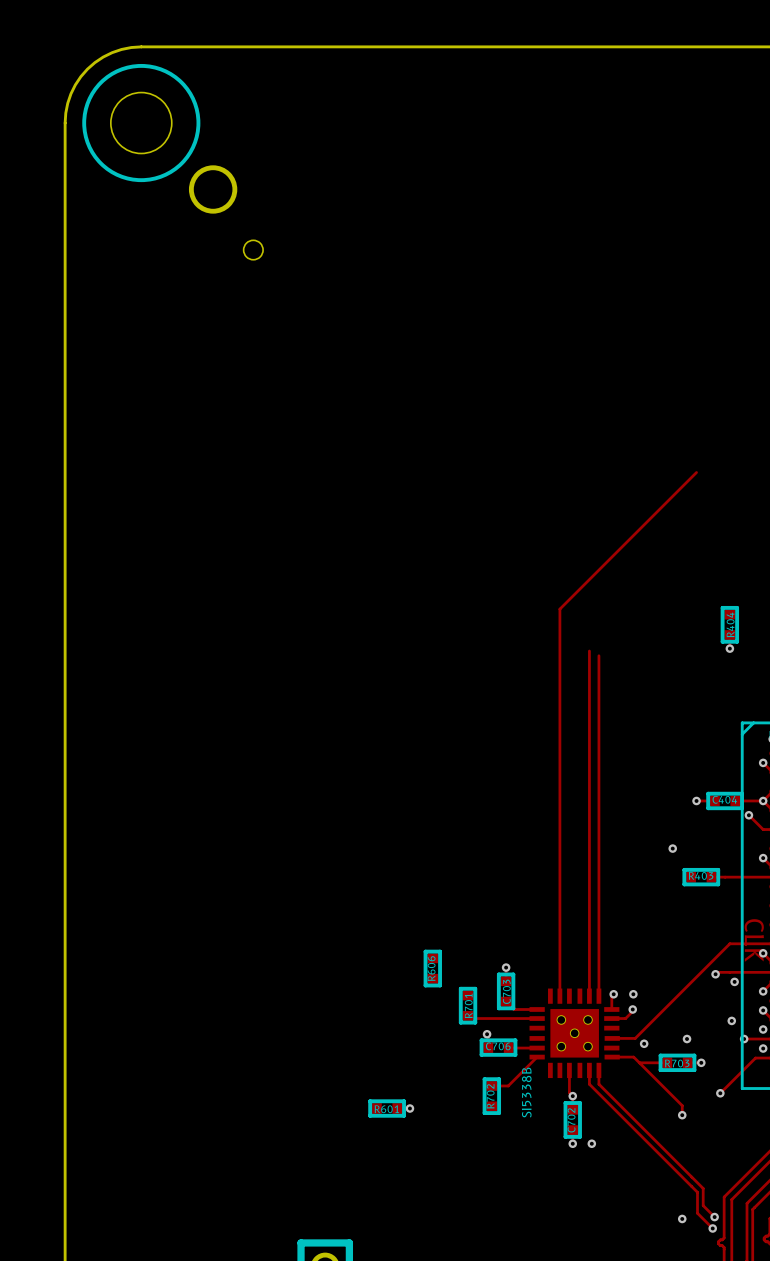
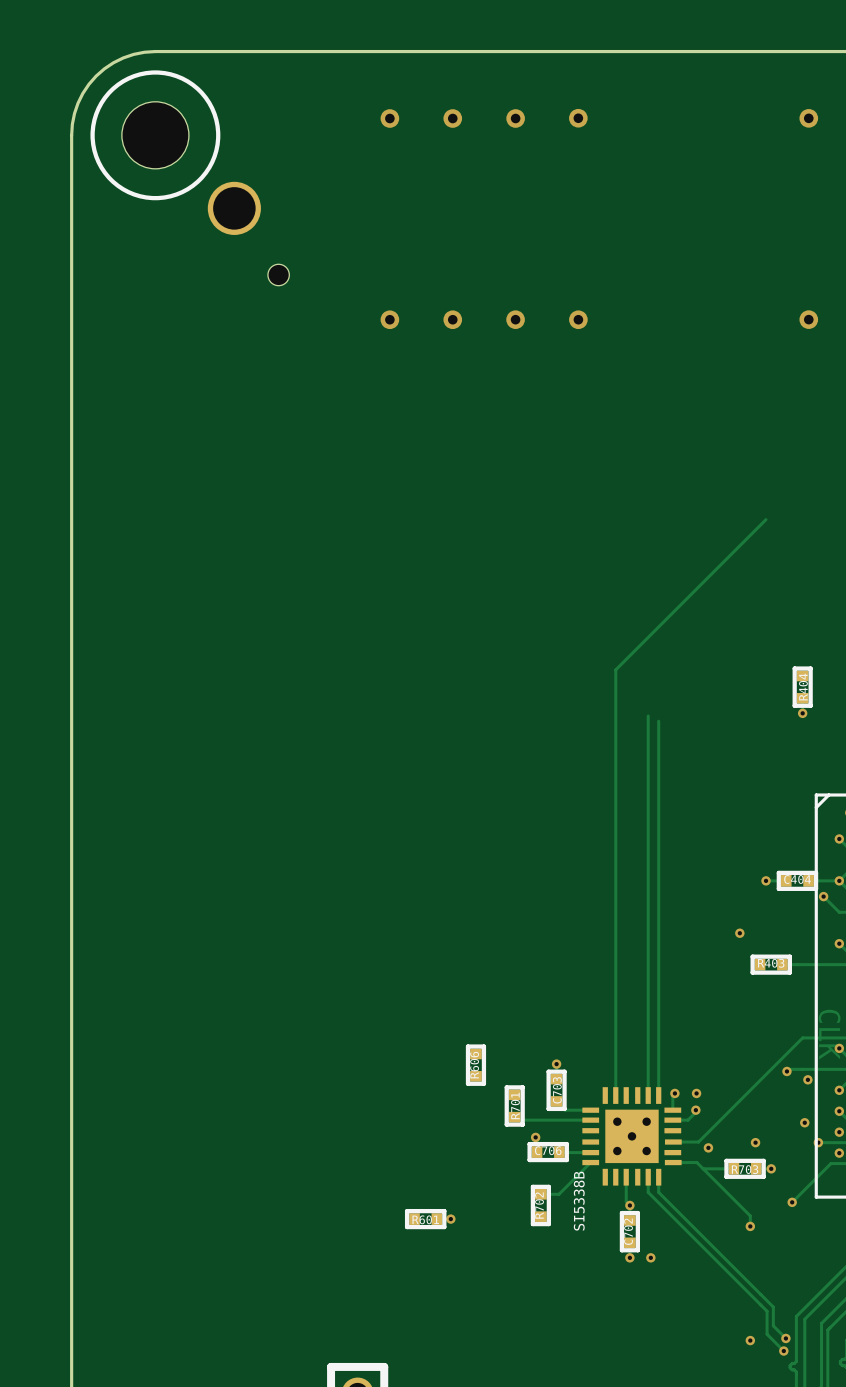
via: none -> (389, 118)
via: none -> (452, 118)
via: none -> (515, 118)
via: none -> (578, 118)
via: none -> (808, 118)
via: none -> (389, 319)
via: none -> (452, 319)
via: none -> (515, 319)
via: none -> (578, 319)
via: none -> (808, 319)

